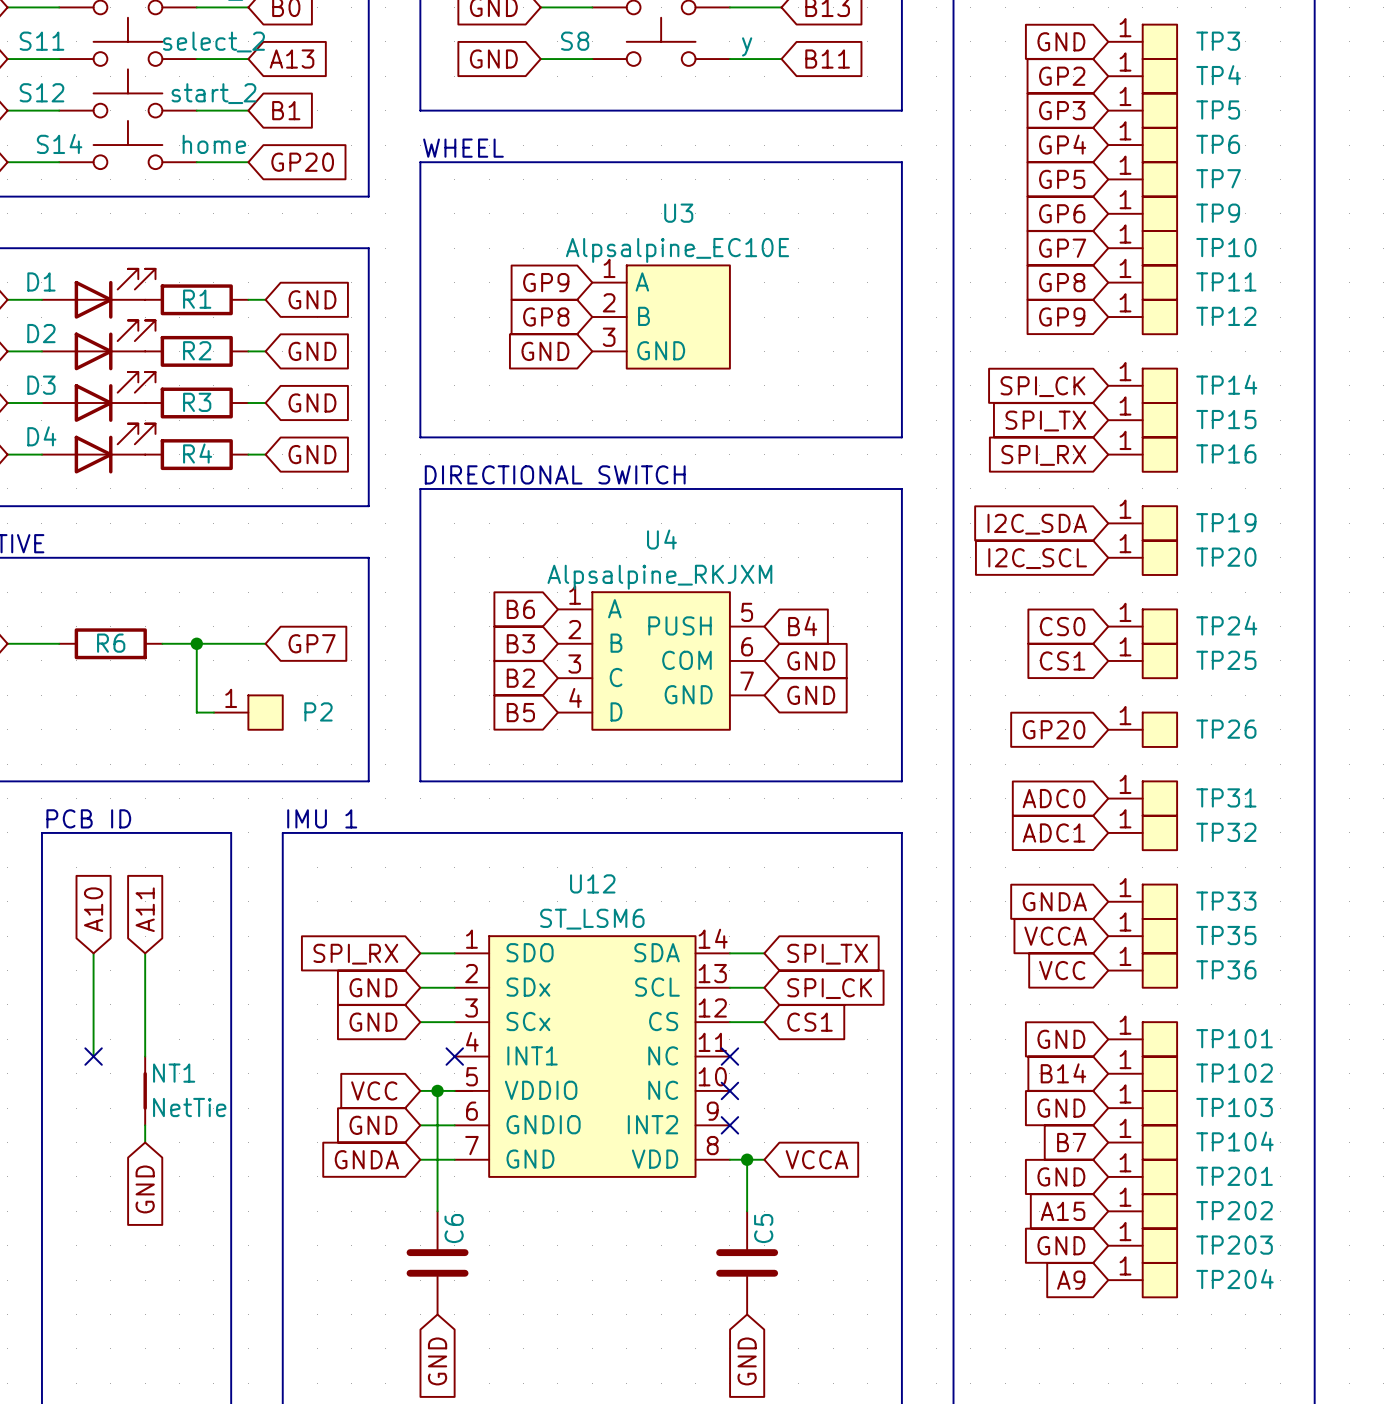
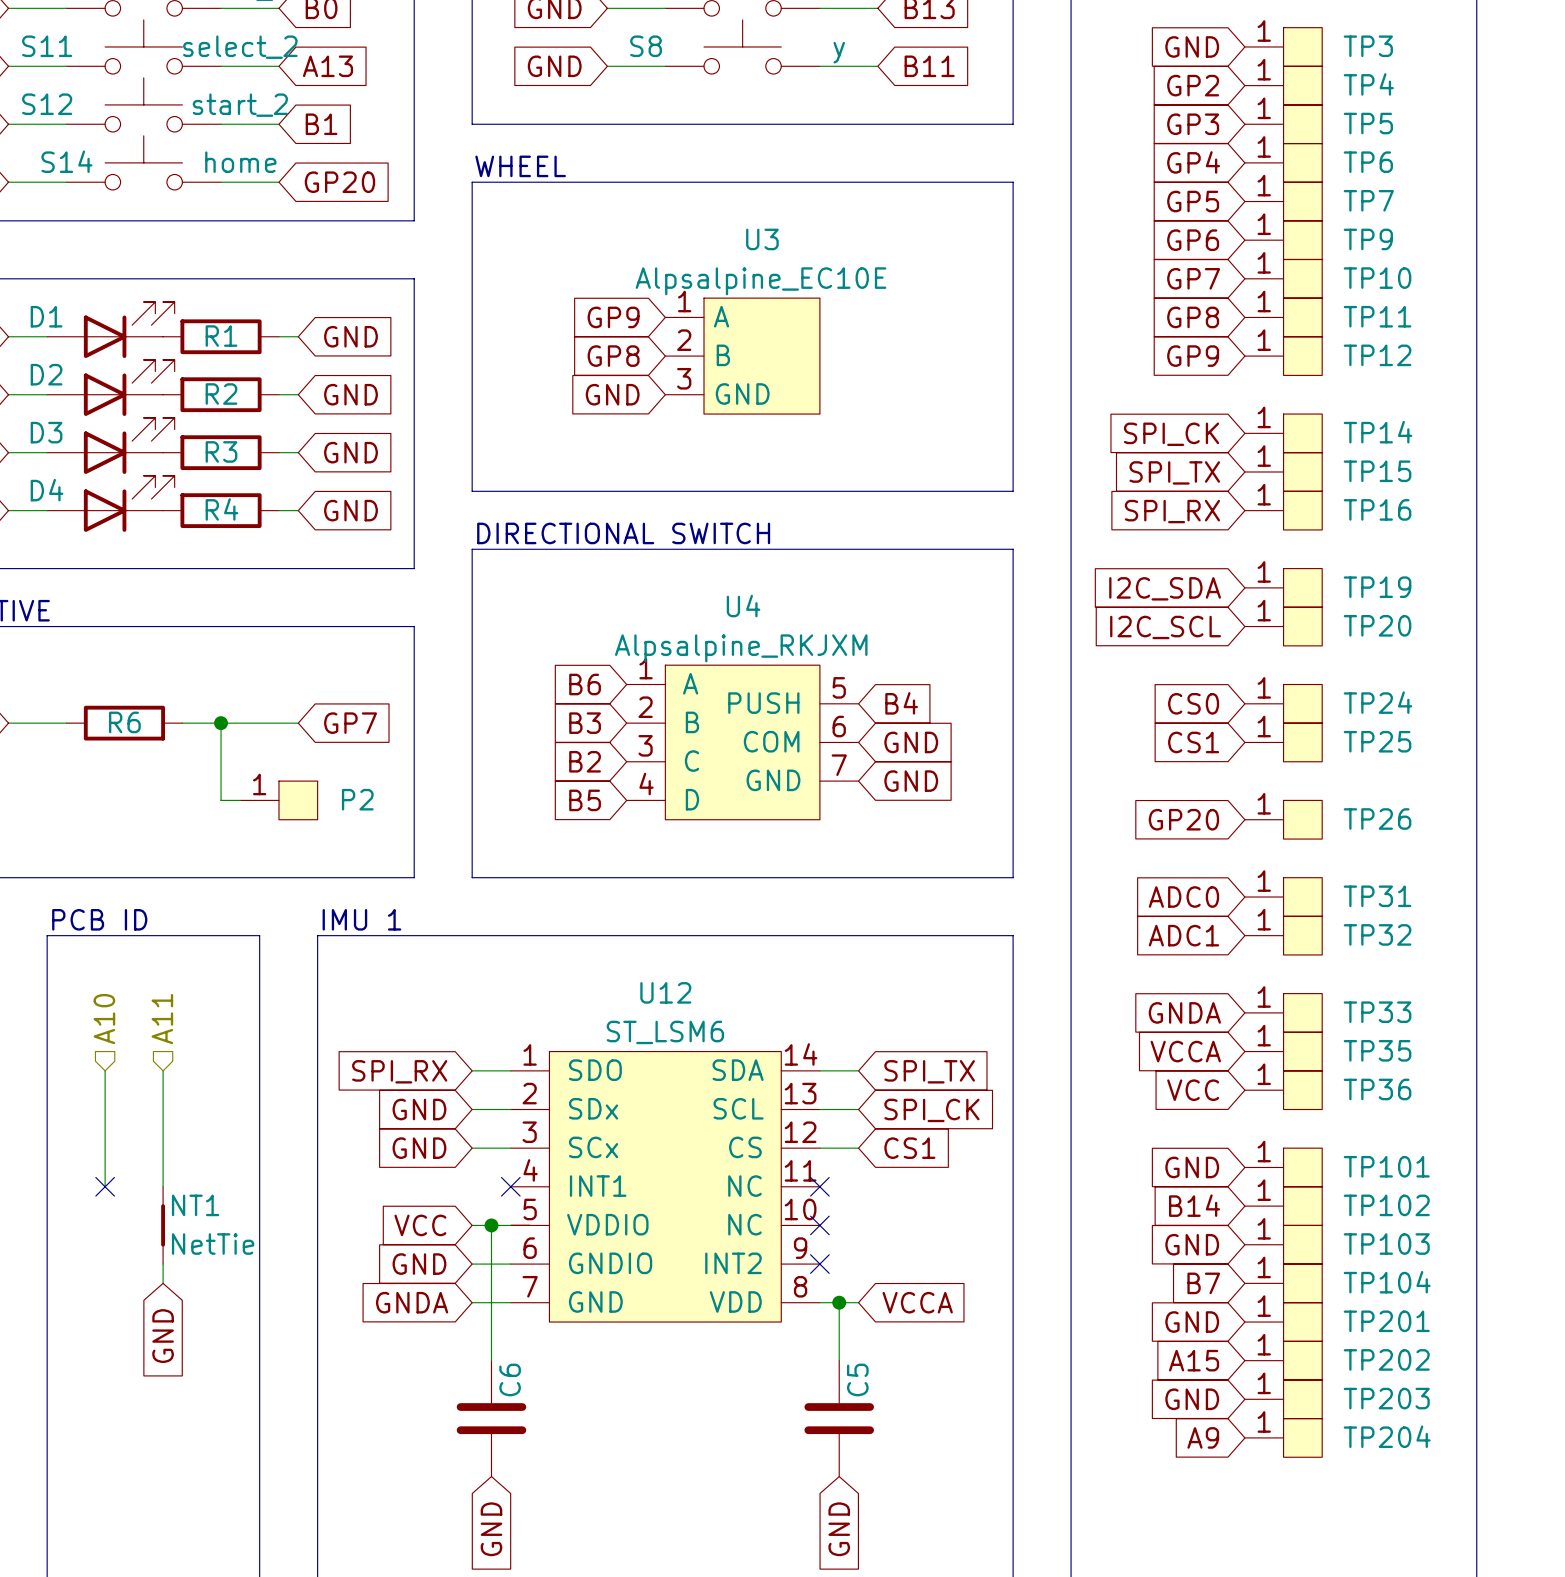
hierarchical label: none -> A10 (104, 1019)
hierarchical label: none -> A11 (162, 1019)
global label: A10 (93, 909) -> none
global label: A11 (145, 909) -> none

